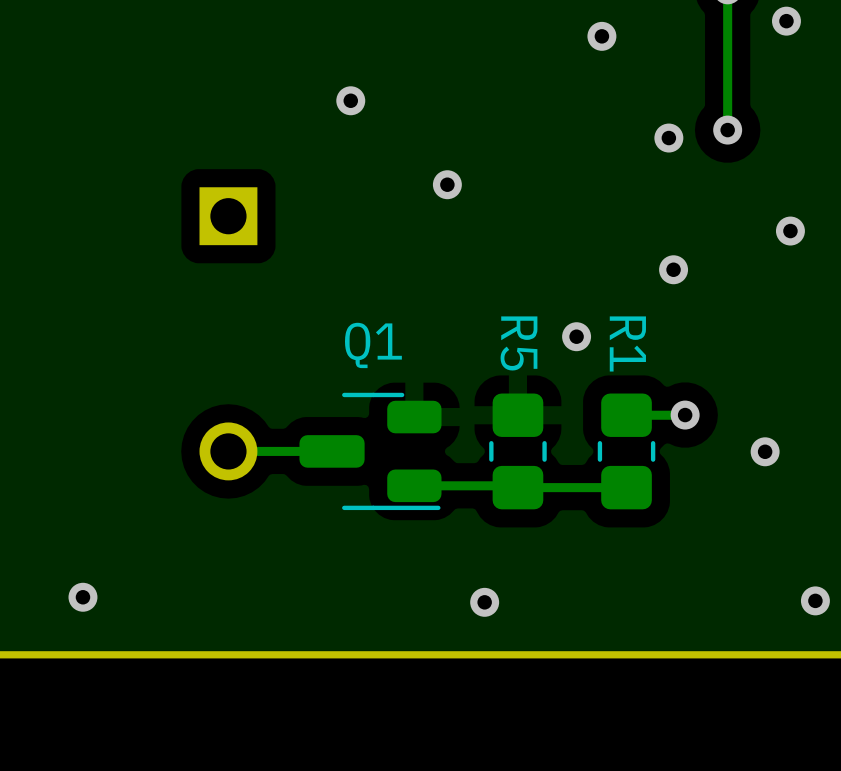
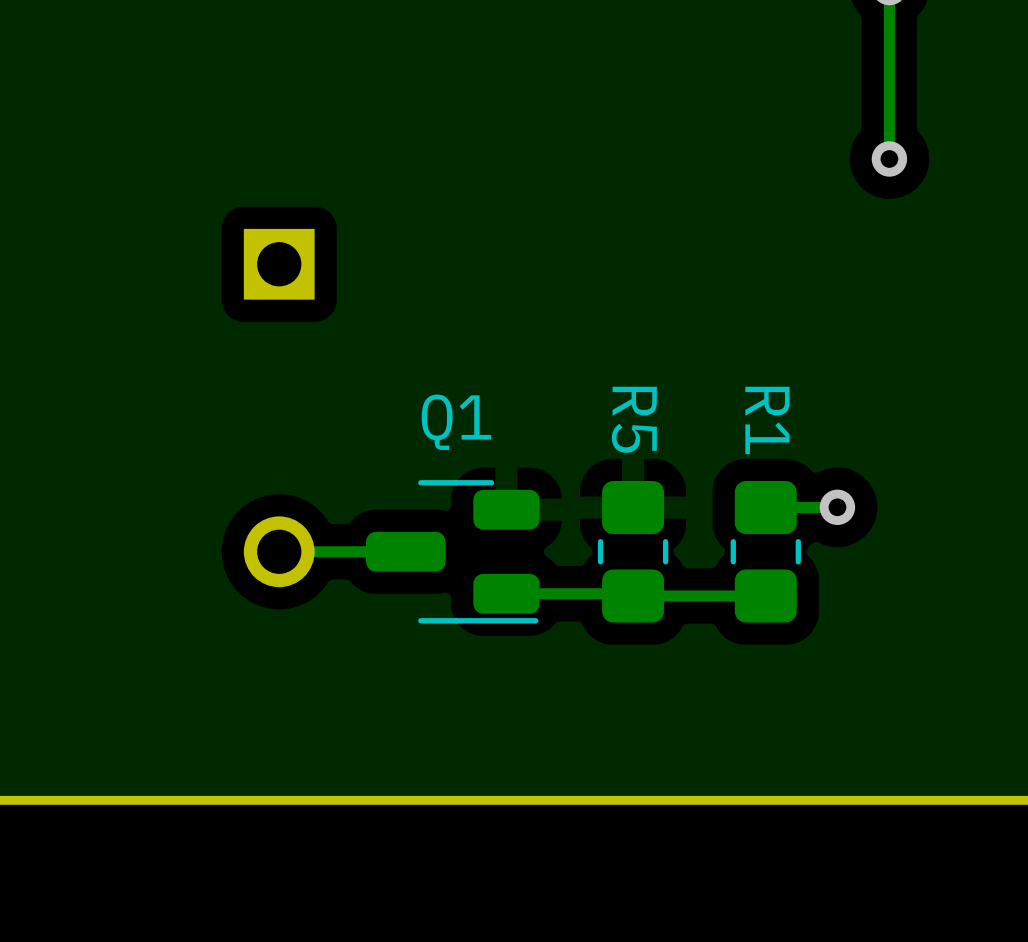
via: (786, 21) -> none
via: (601, 36) -> none
via: (350, 100) -> none
via: (668, 138) -> none
via: (447, 184) -> none
via: (790, 231) -> none
via: (673, 269) -> none
via: (576, 336) -> none
via: (765, 451) -> none
via: (82, 597) -> none
via: (815, 600) -> none
via: (484, 602) -> none

